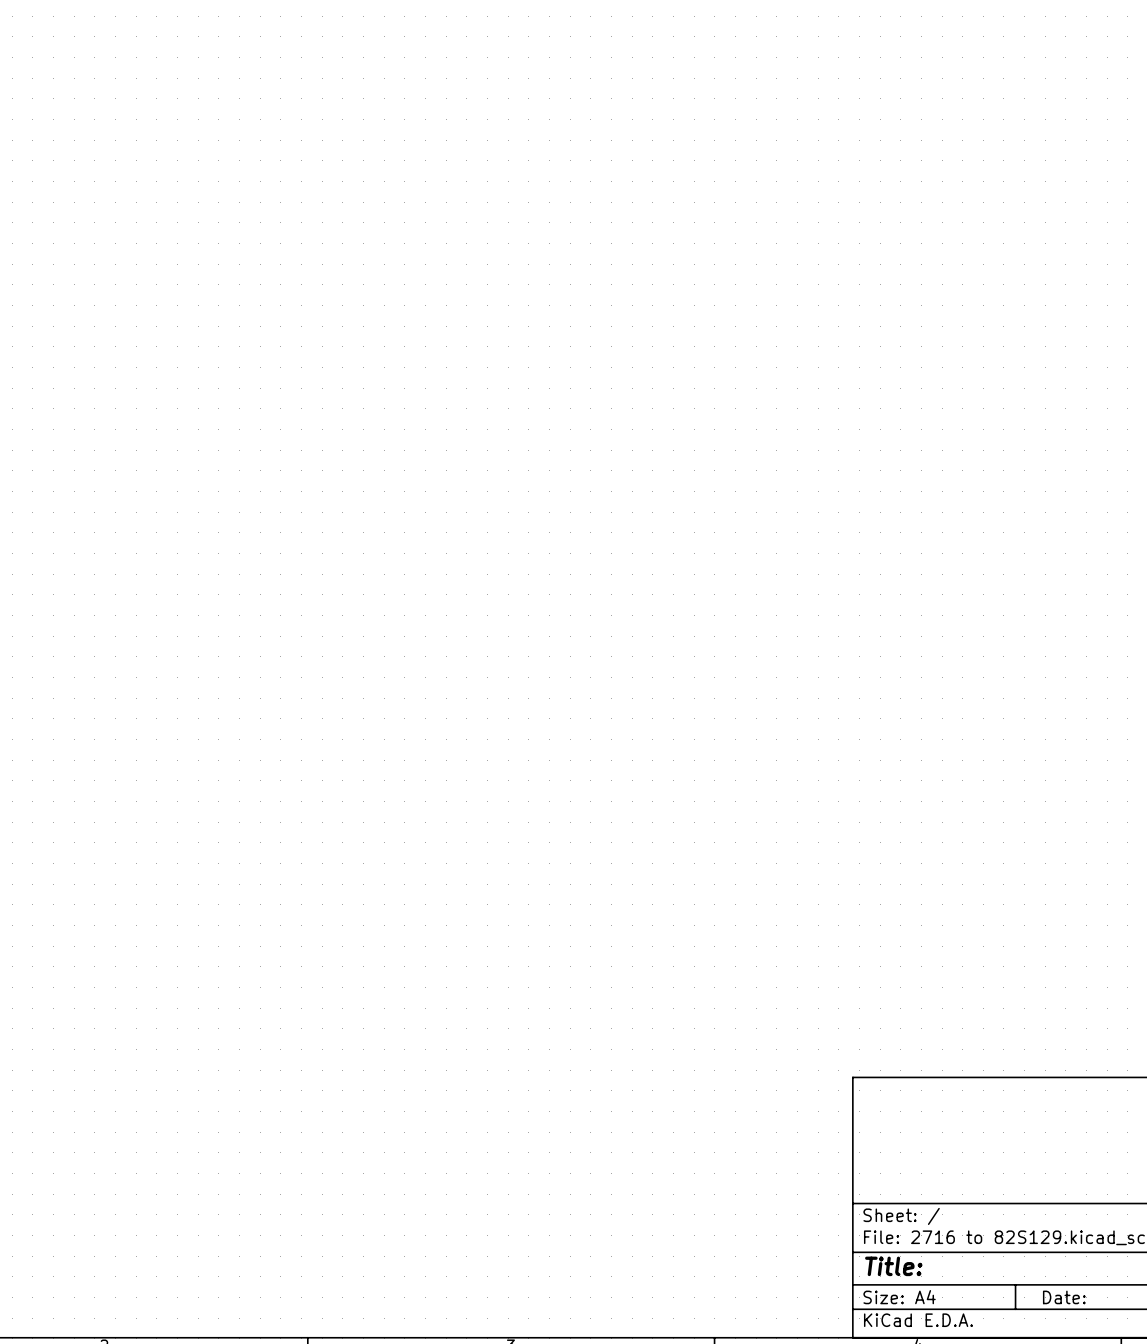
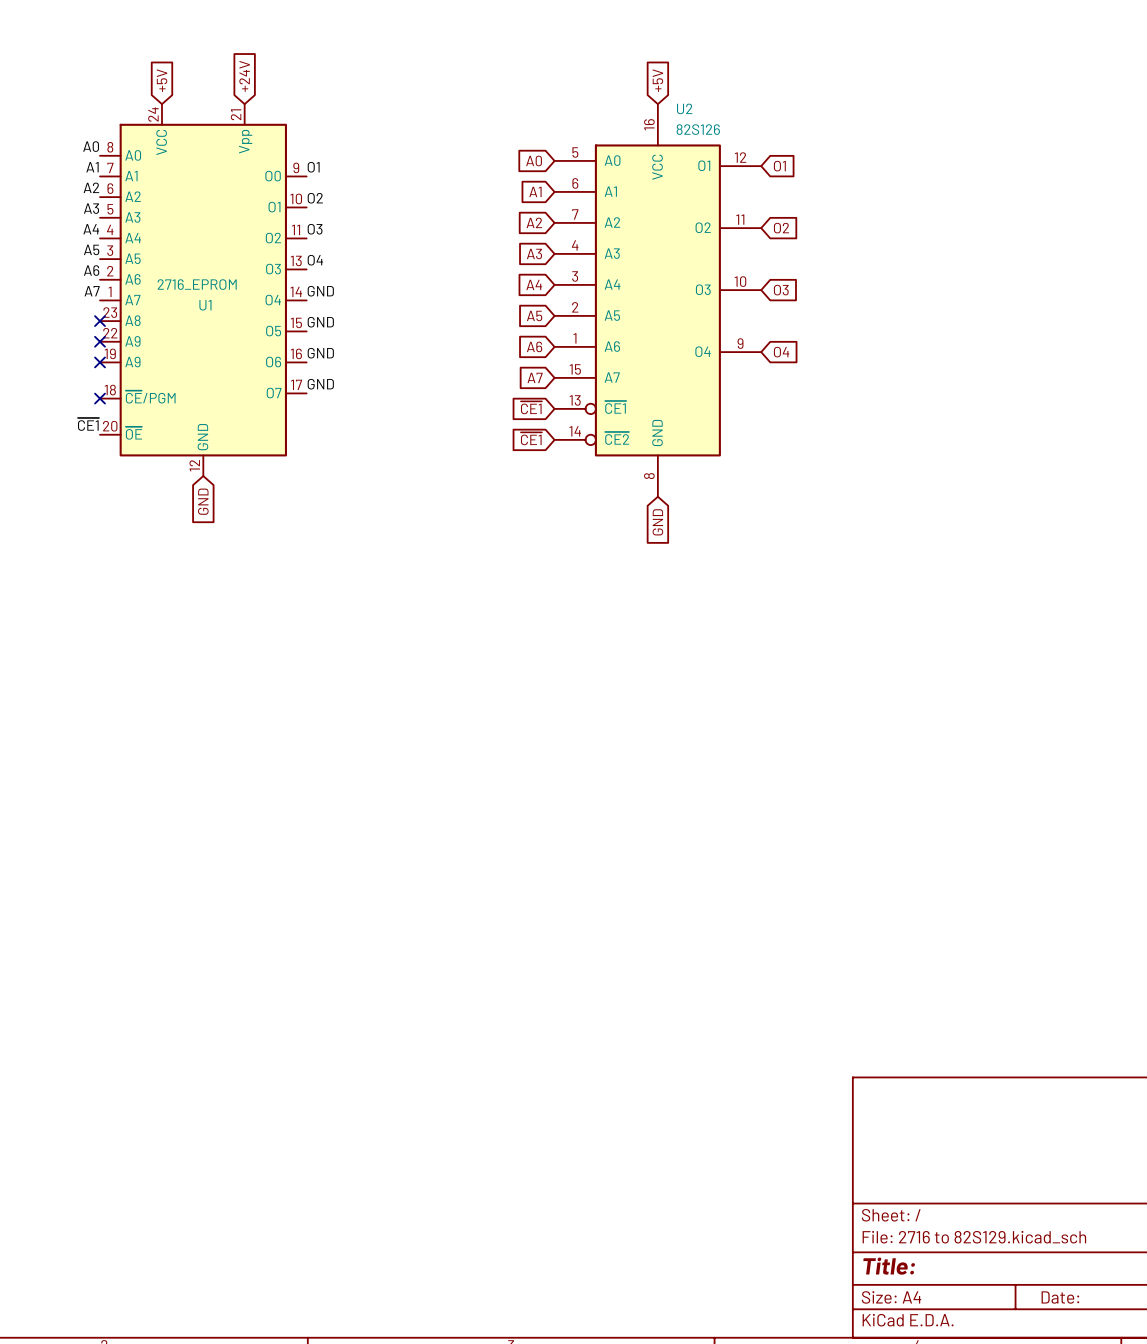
global label: none -> +24V (244, 76)
global label: none -> +5V (162, 80)
global label: none -> +5V (657, 80)
label: none -> A0 (91, 146)
global label: none -> A0 (534, 160)
global label: none -> O1 (779, 166)
label: none -> A1 (92, 167)
label: none -> O1 (313, 167)
label: none -> A2 (91, 187)
global label: none -> A1 (535, 191)
label: none -> O2 (315, 198)
label: none -> A3 (91, 208)
global label: none -> A2 (534, 222)
label: none -> A4 (91, 229)
global label: none -> O2 (781, 228)
label: none -> O3 (315, 229)
label: none -> A5 (91, 249)
global label: none -> A3 (534, 254)
label: none -> O4 (315, 260)
label: none -> A6 (91, 270)
global label: none -> A4 (534, 284)
U1: none -> 2716_EPROM (203, 290)
global label: none -> O3 (781, 290)
label: none -> A7 (92, 291)
label: none -> GND (320, 291)
U2: none -> 82S126 (657, 300)
global label: none -> A5 (534, 315)
no-connect mark: none -> (100, 321)
label: none -> GND (320, 322)
no-connect mark: none -> (100, 341)
global label: none -> A6 (534, 346)
global label: none -> O4 (781, 352)
label: none -> GND (320, 353)
no-connect mark: none -> (100, 362)
global label: none -> A7 (535, 377)
label: none -> GND (320, 384)
no-connect mark: none -> (100, 398)
global label: none -> ~{CE1} (531, 407)
label: none -> ~{CE1} (88, 424)
global label: none -> ~{CE1} (531, 438)
global label: none -> GND (203, 501)
global label: none -> GND (657, 522)

